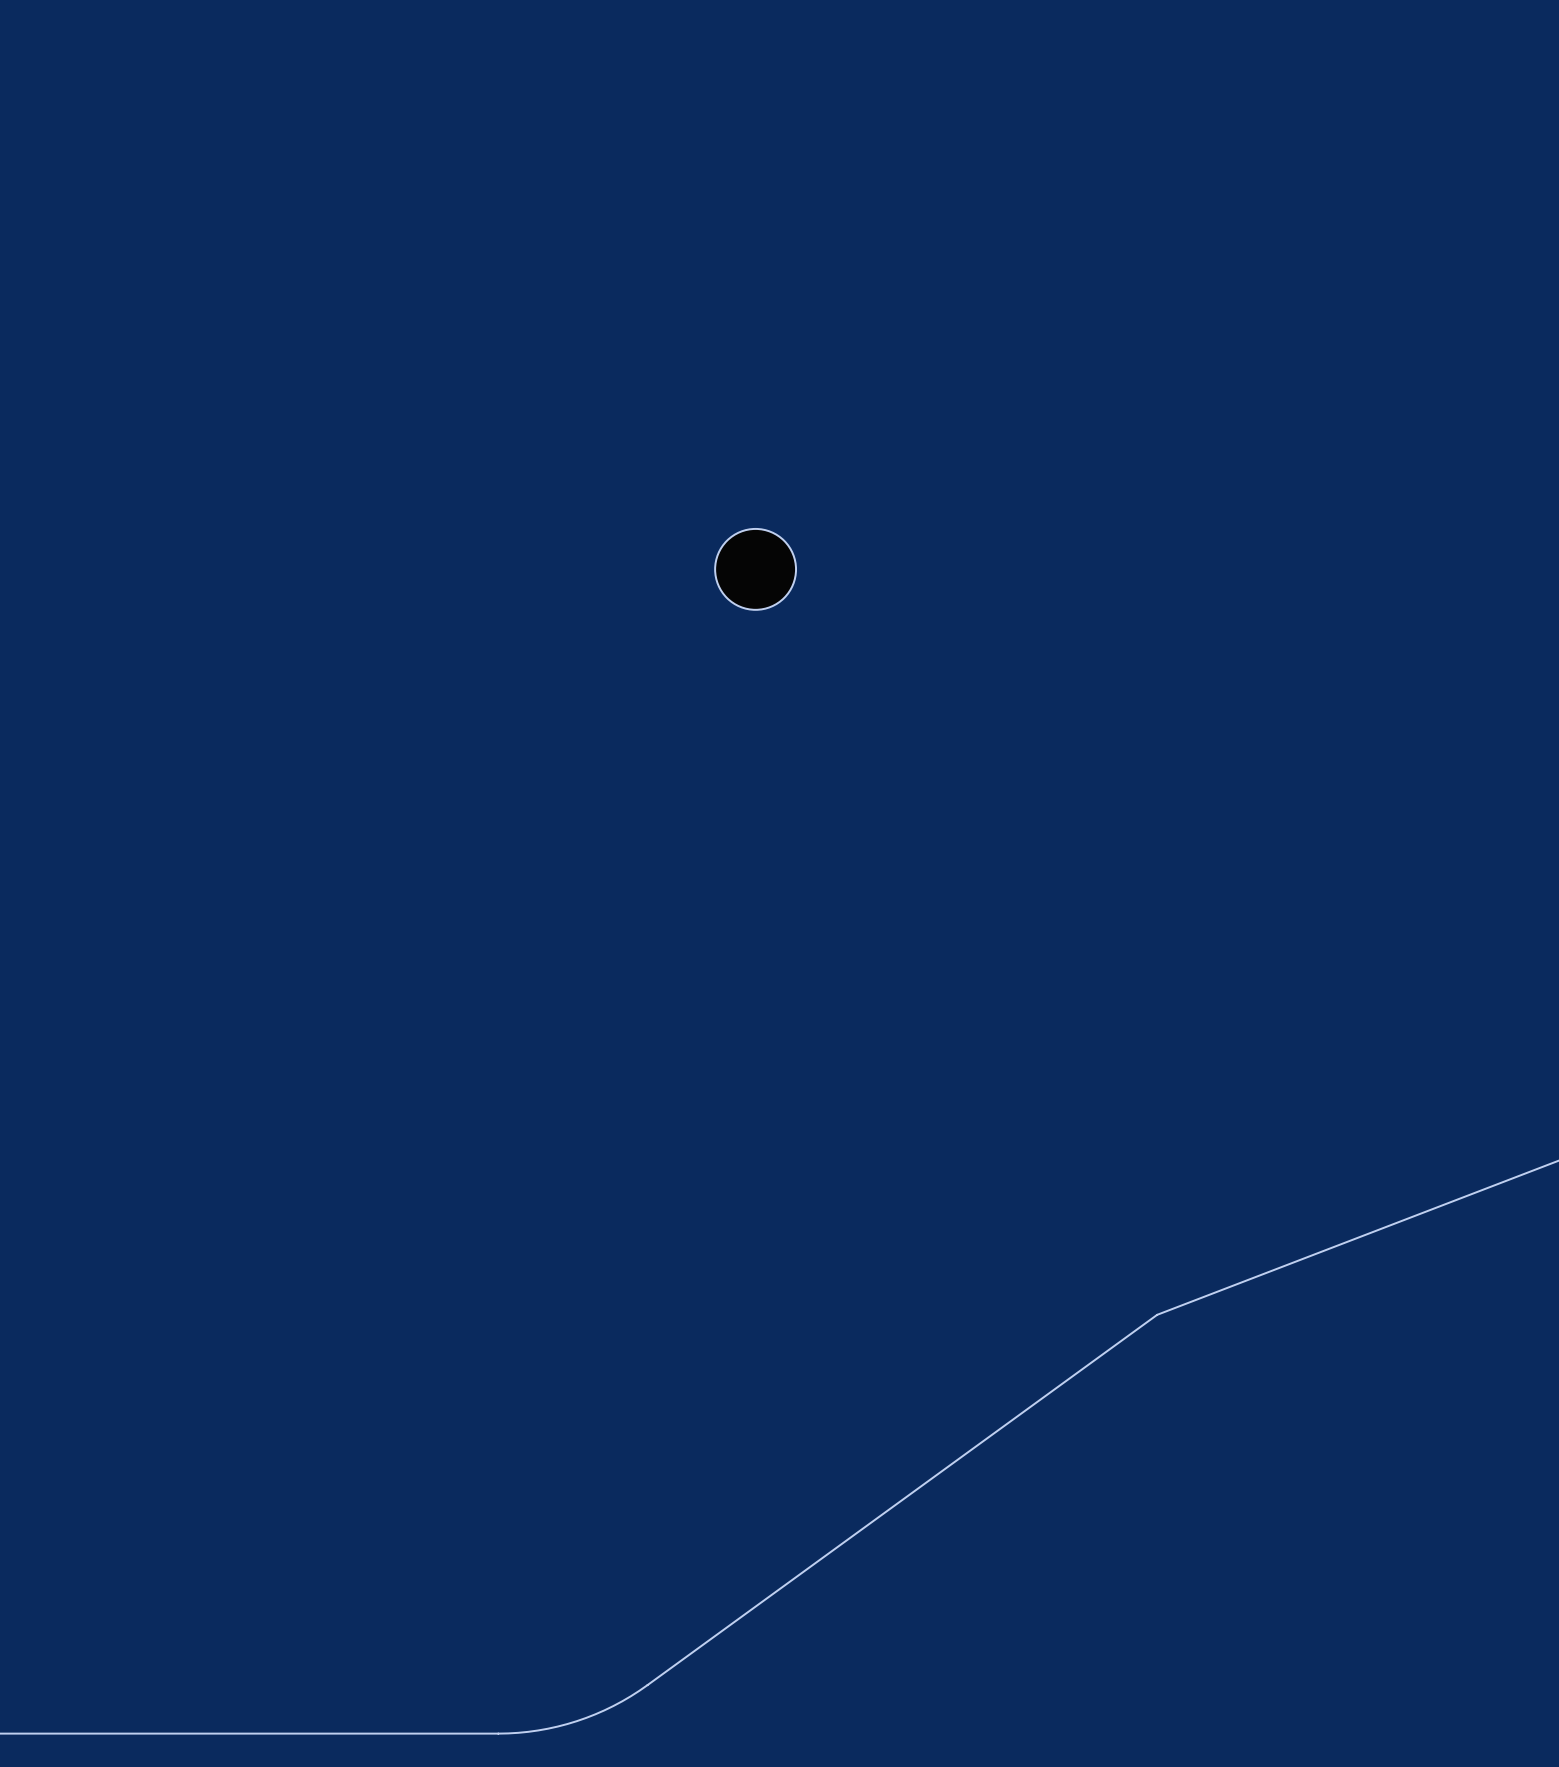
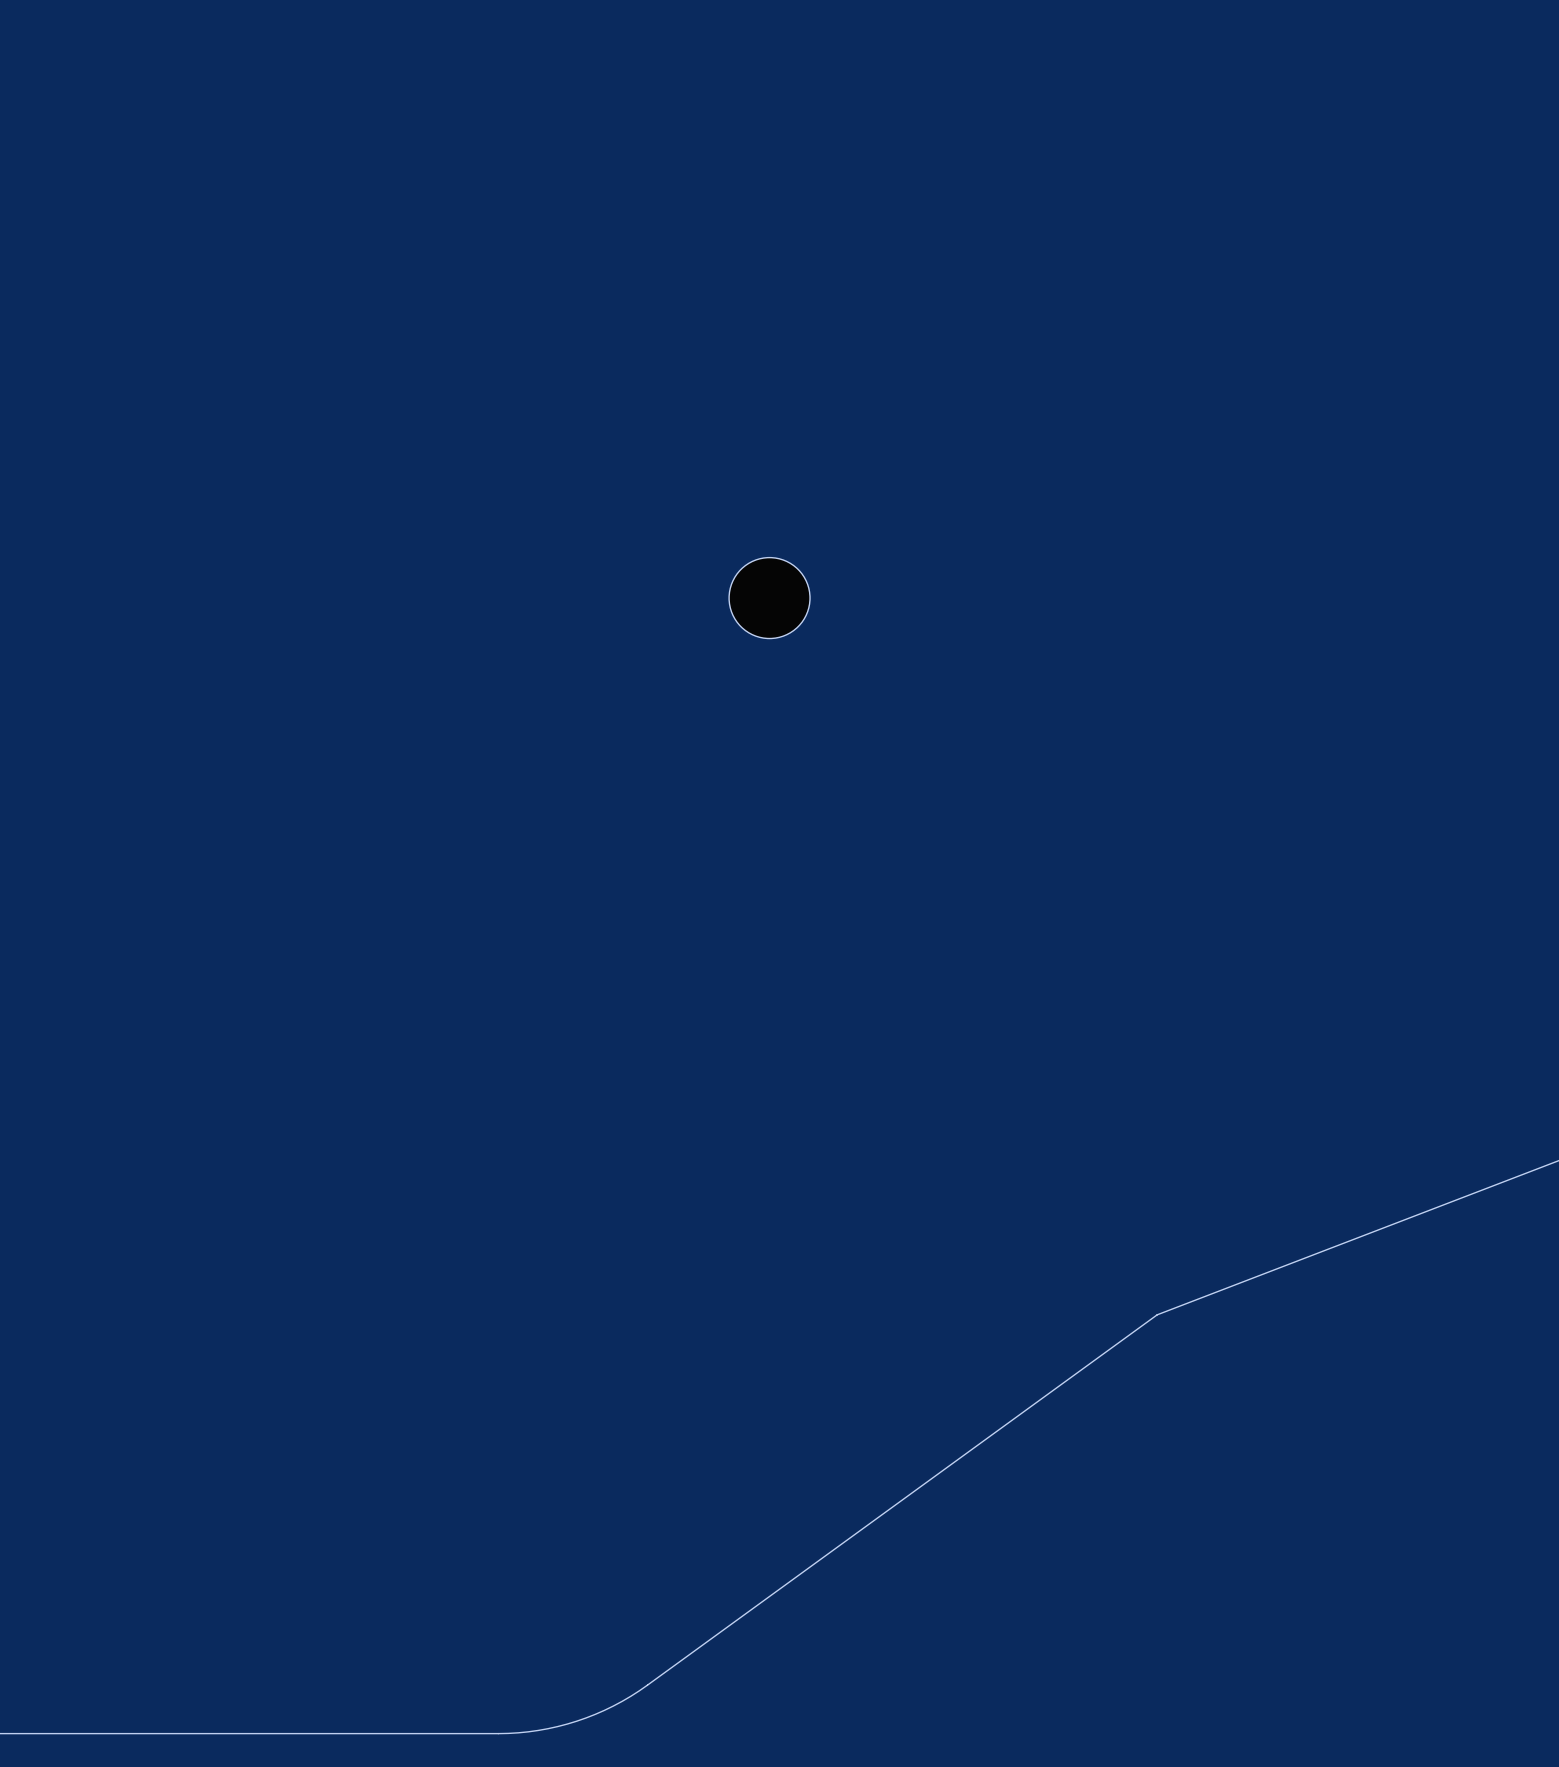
part position: (755, 569) -> (769, 598)

